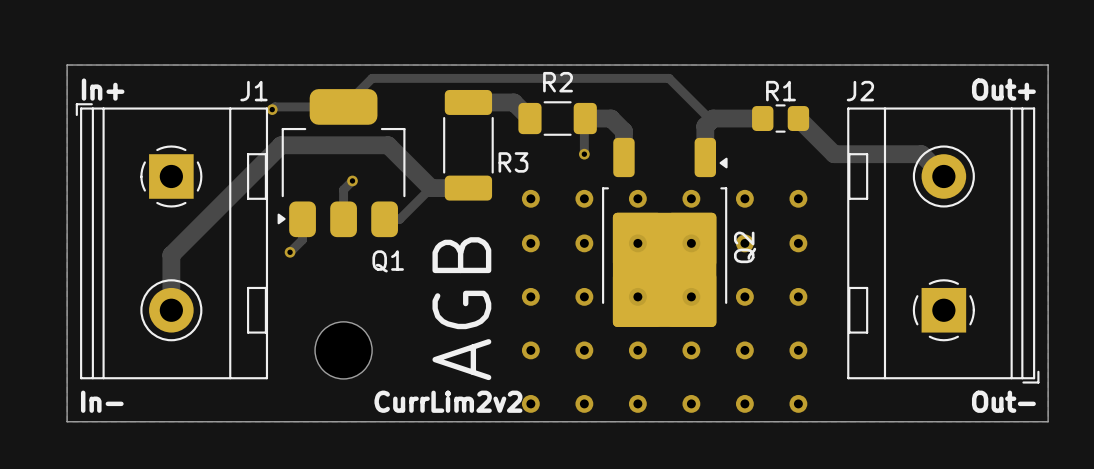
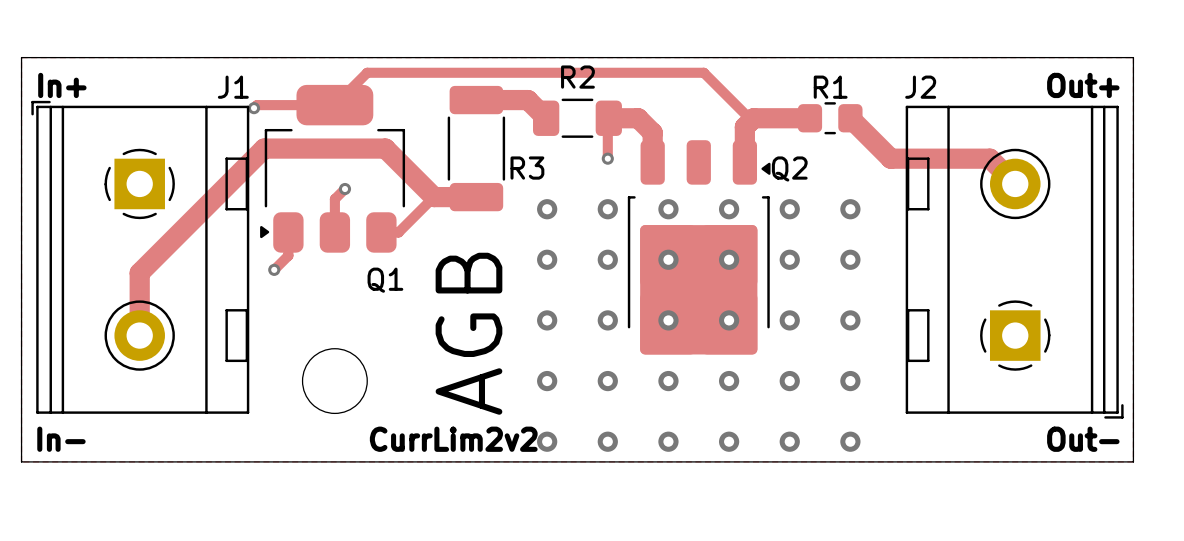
Q2 footprint: [602, 137, 728, 327] -> [627, 140, 771, 355]
Q2 name position: Q2 (745, 247) -> Q2 (789, 169)

